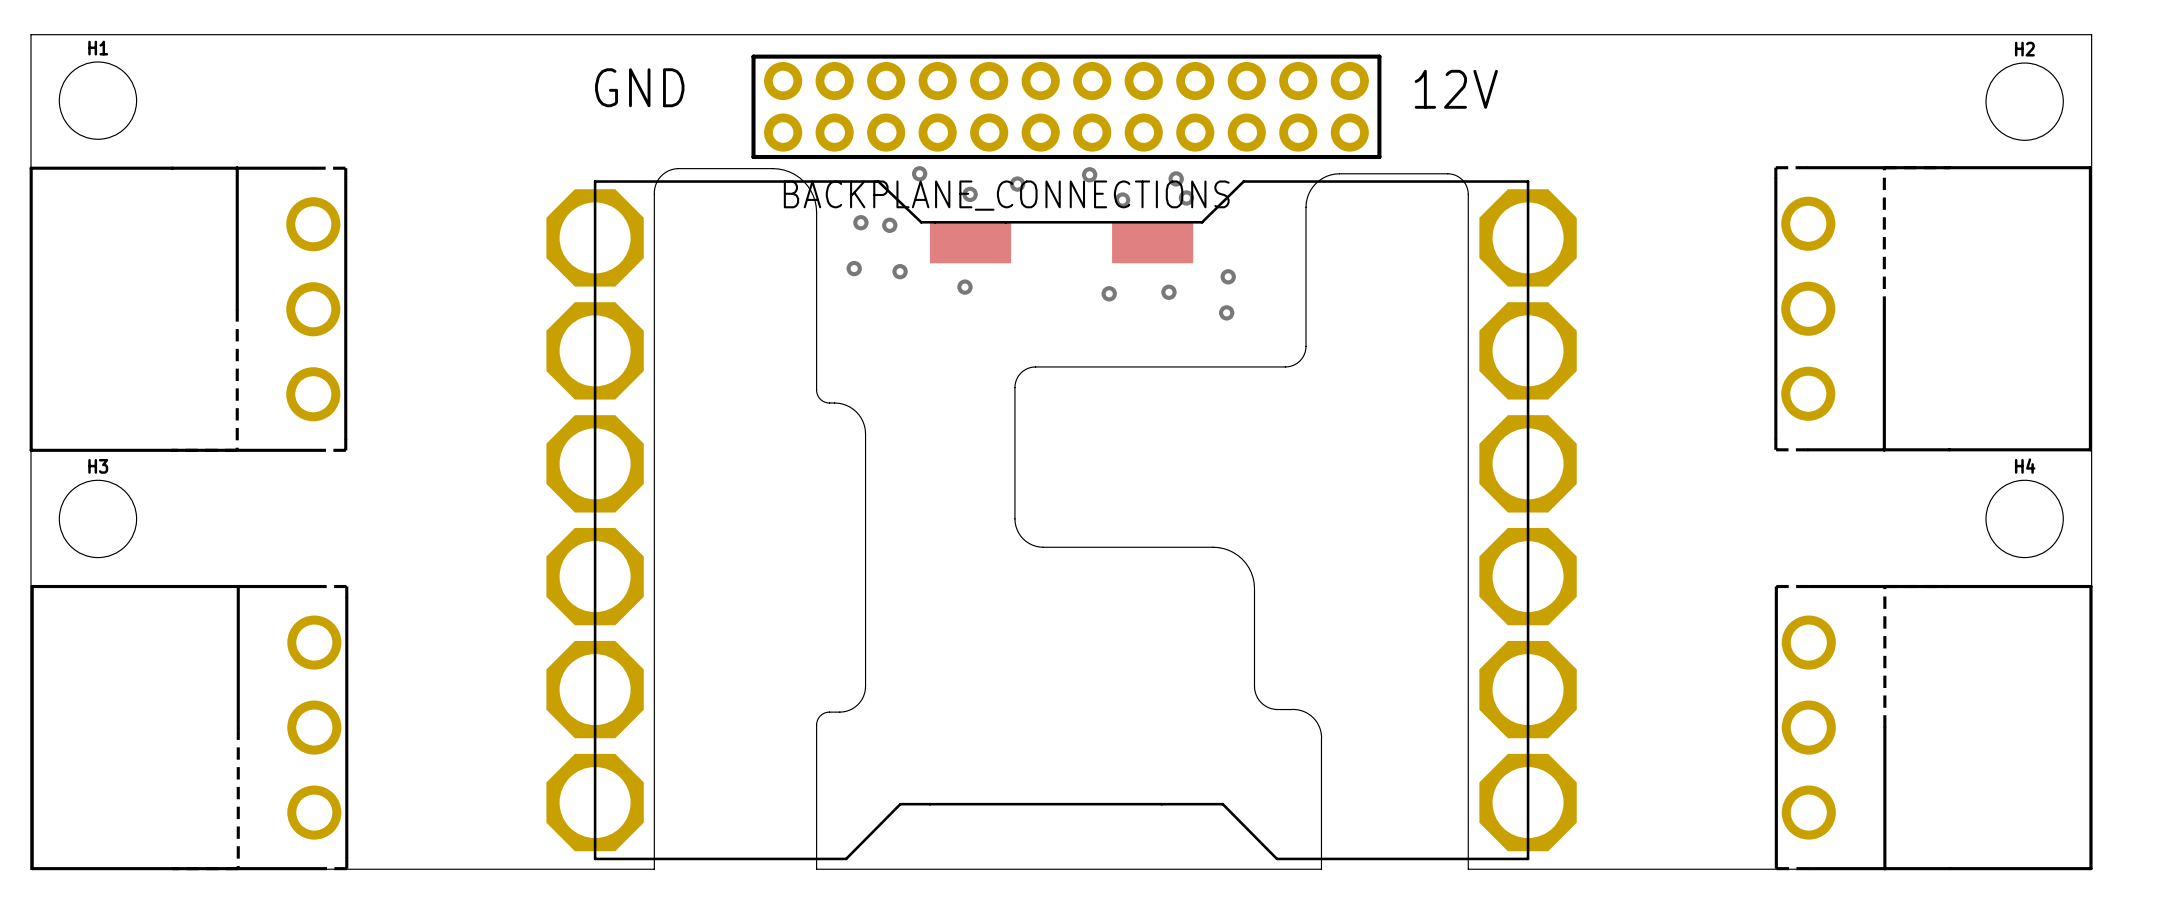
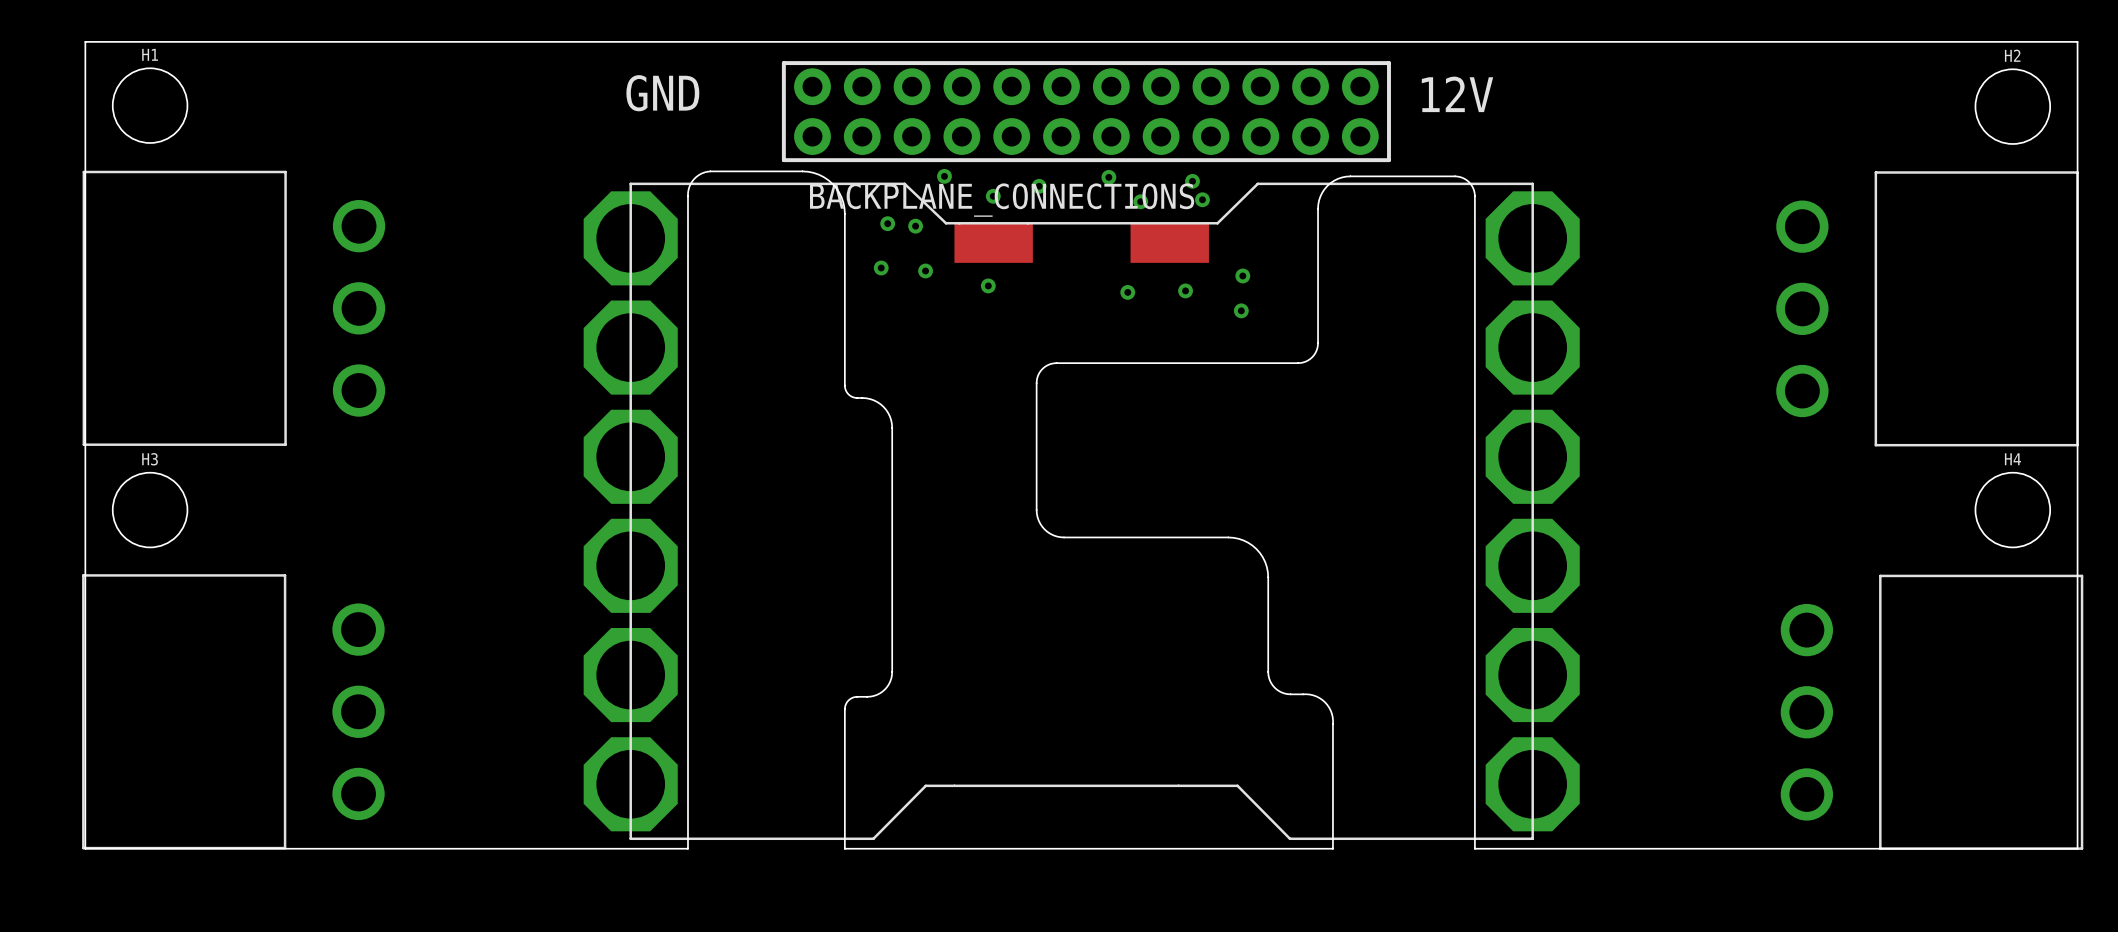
part footprint: [29, 166, 348, 452] -> [82, 170, 386, 446]
part footprint: [1774, 166, 2092, 452] -> [1776, 171, 2079, 447]
part footprint: [30, 584, 349, 871] -> [82, 574, 385, 850]
part footprint: [1774, 584, 2093, 871] -> [1780, 574, 2084, 850]

